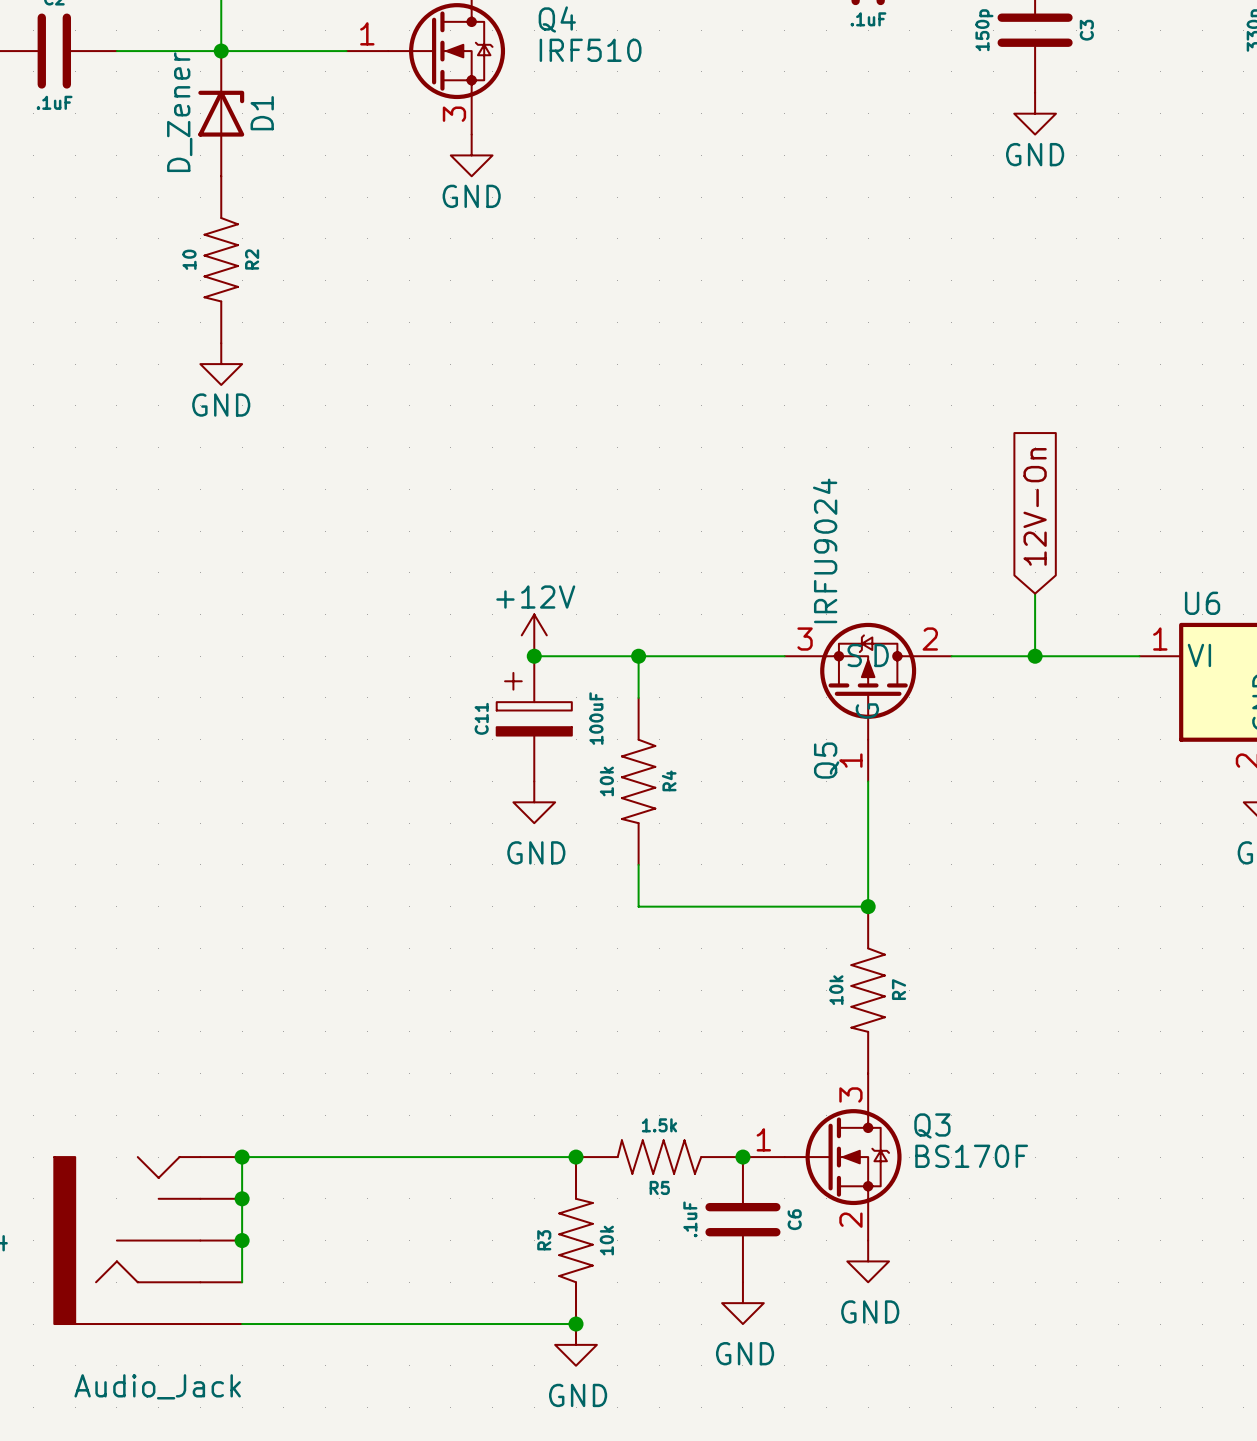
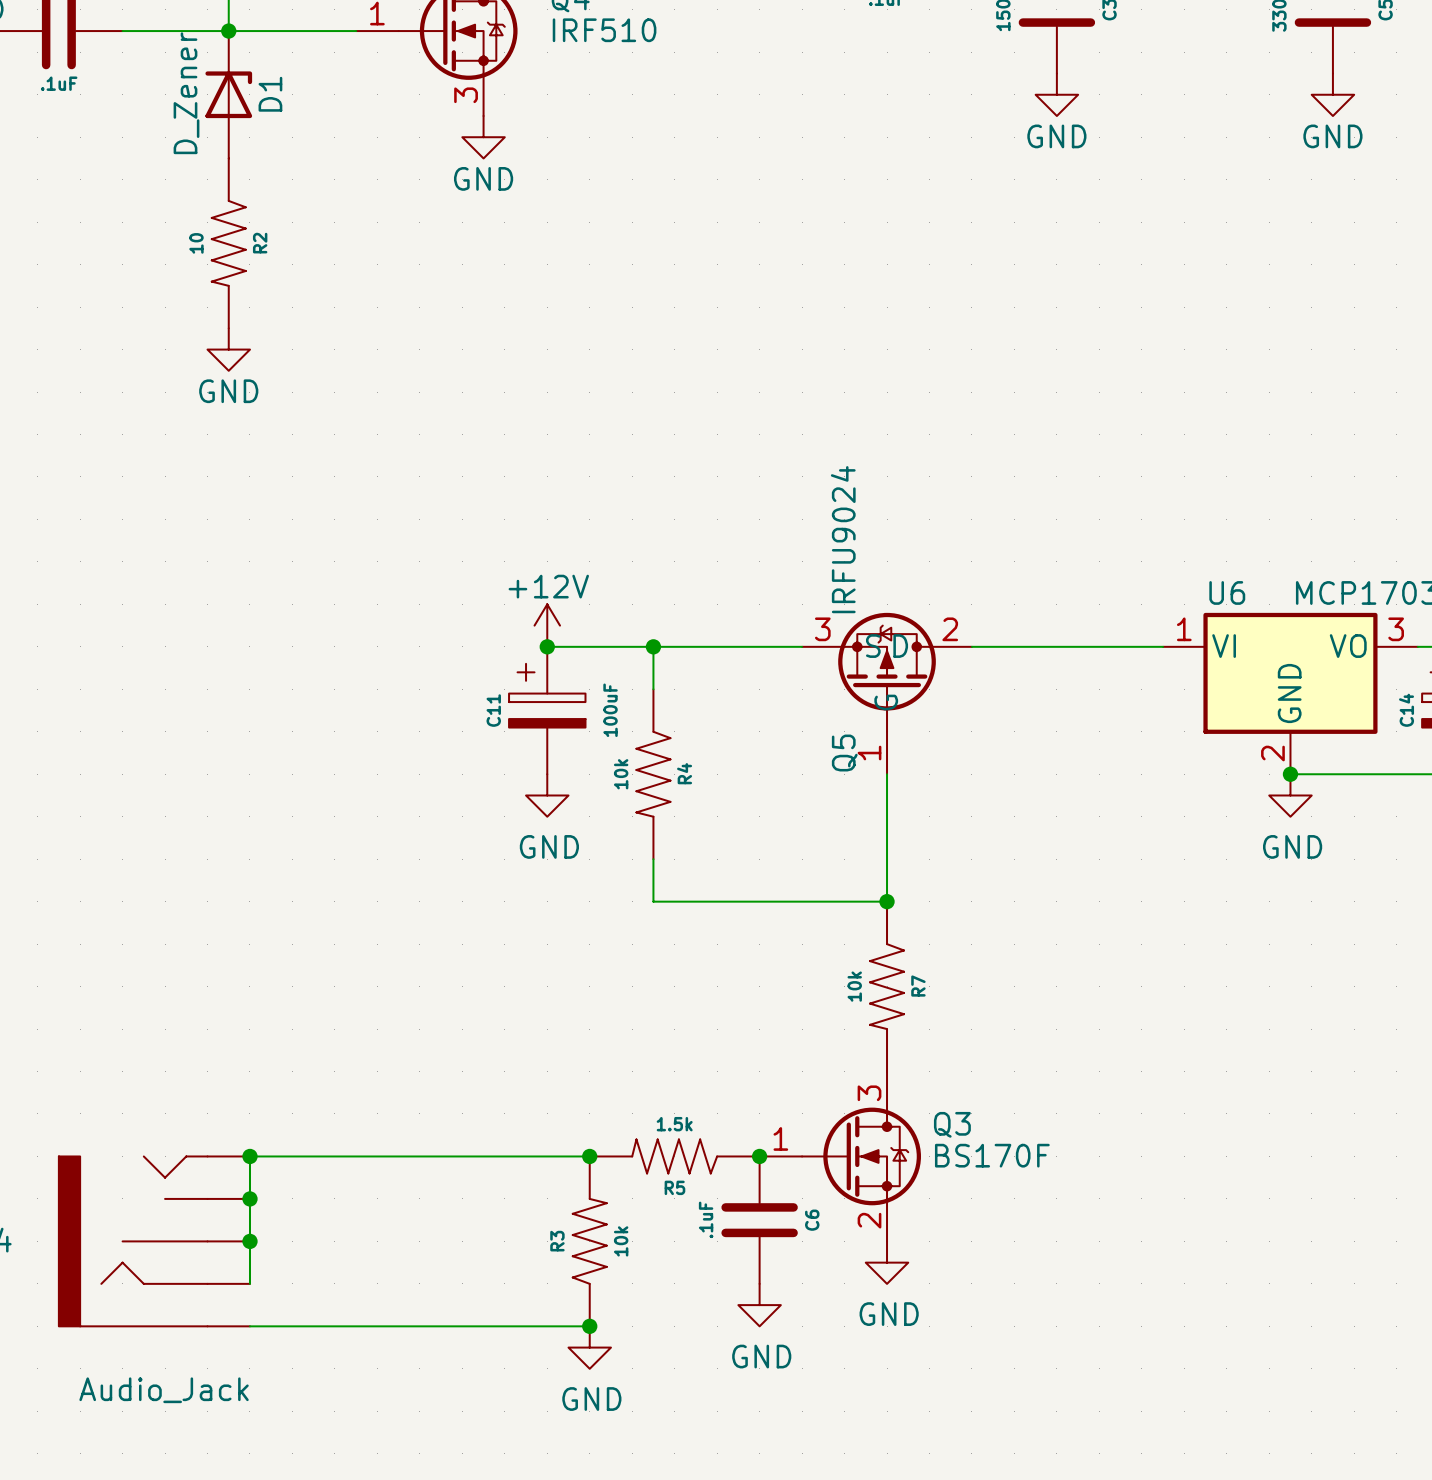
global label: 12V-On (1035, 506) -> none
wire: (1035, 593) (1035, 656) -> none
junction: (1035, 656) -> none

